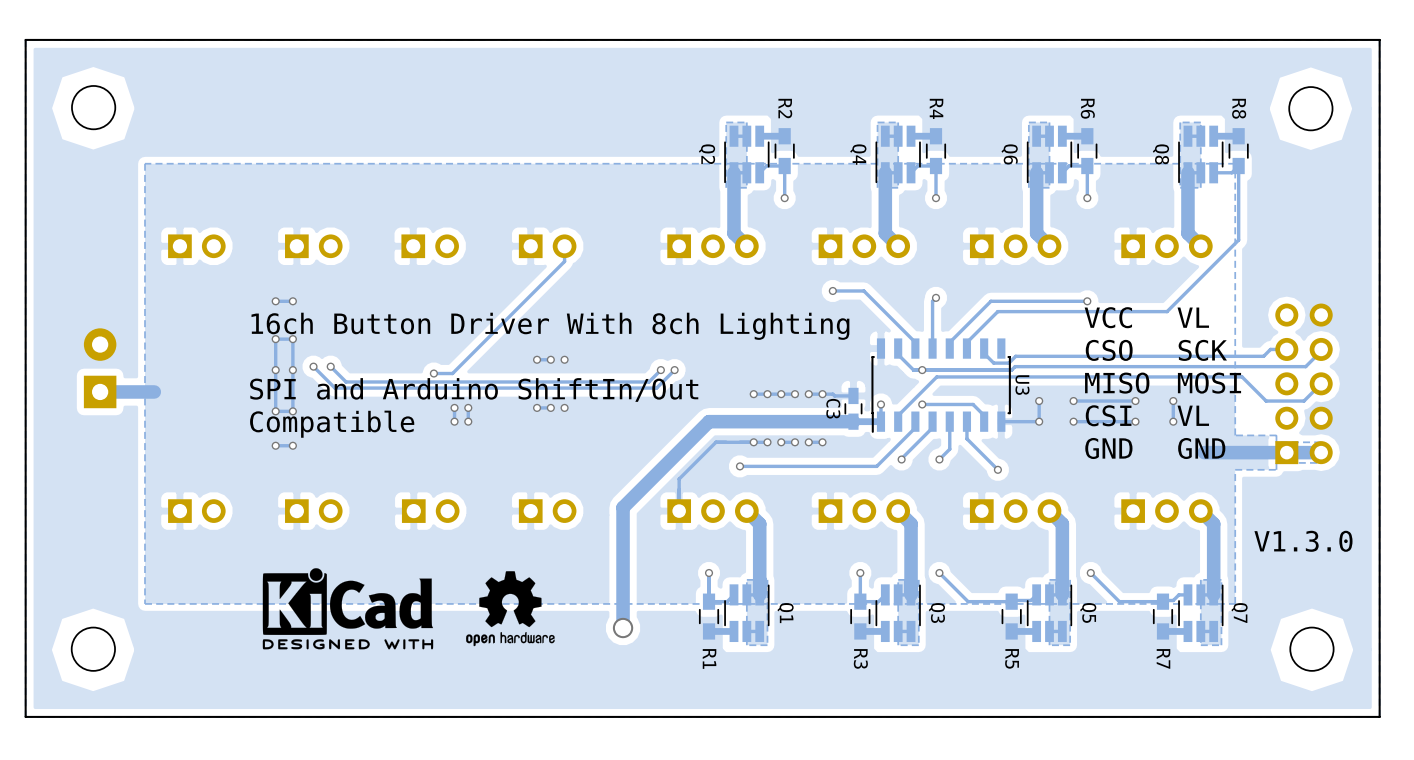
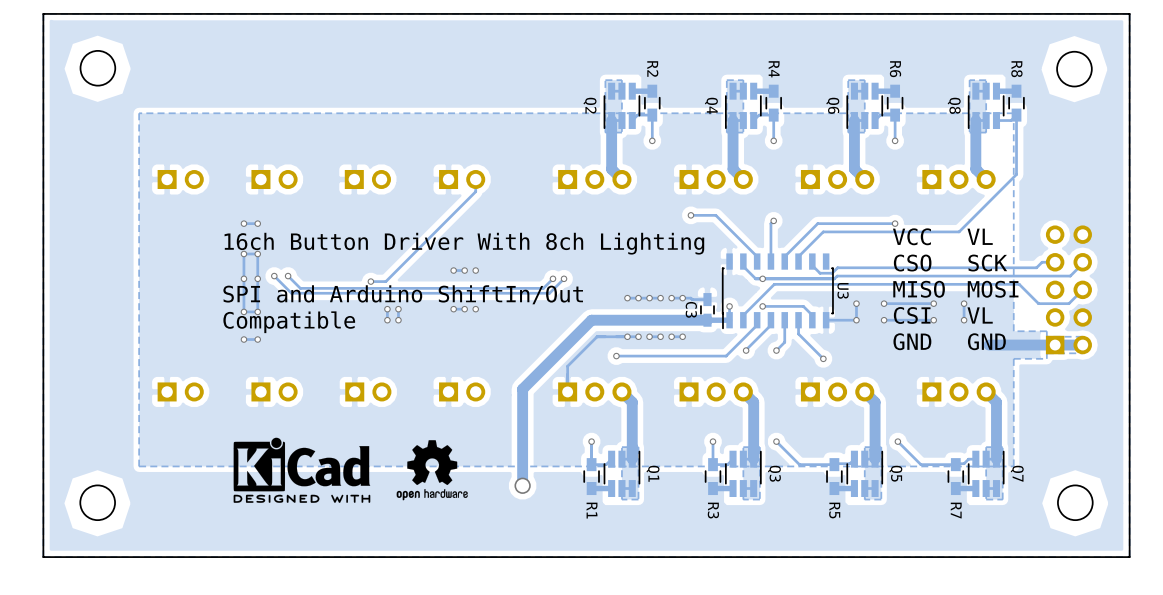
part: (100, 368) -> none
track: (154, 391) (100, 391) -> none
text: V1.3.0 (1303, 541) -> none

